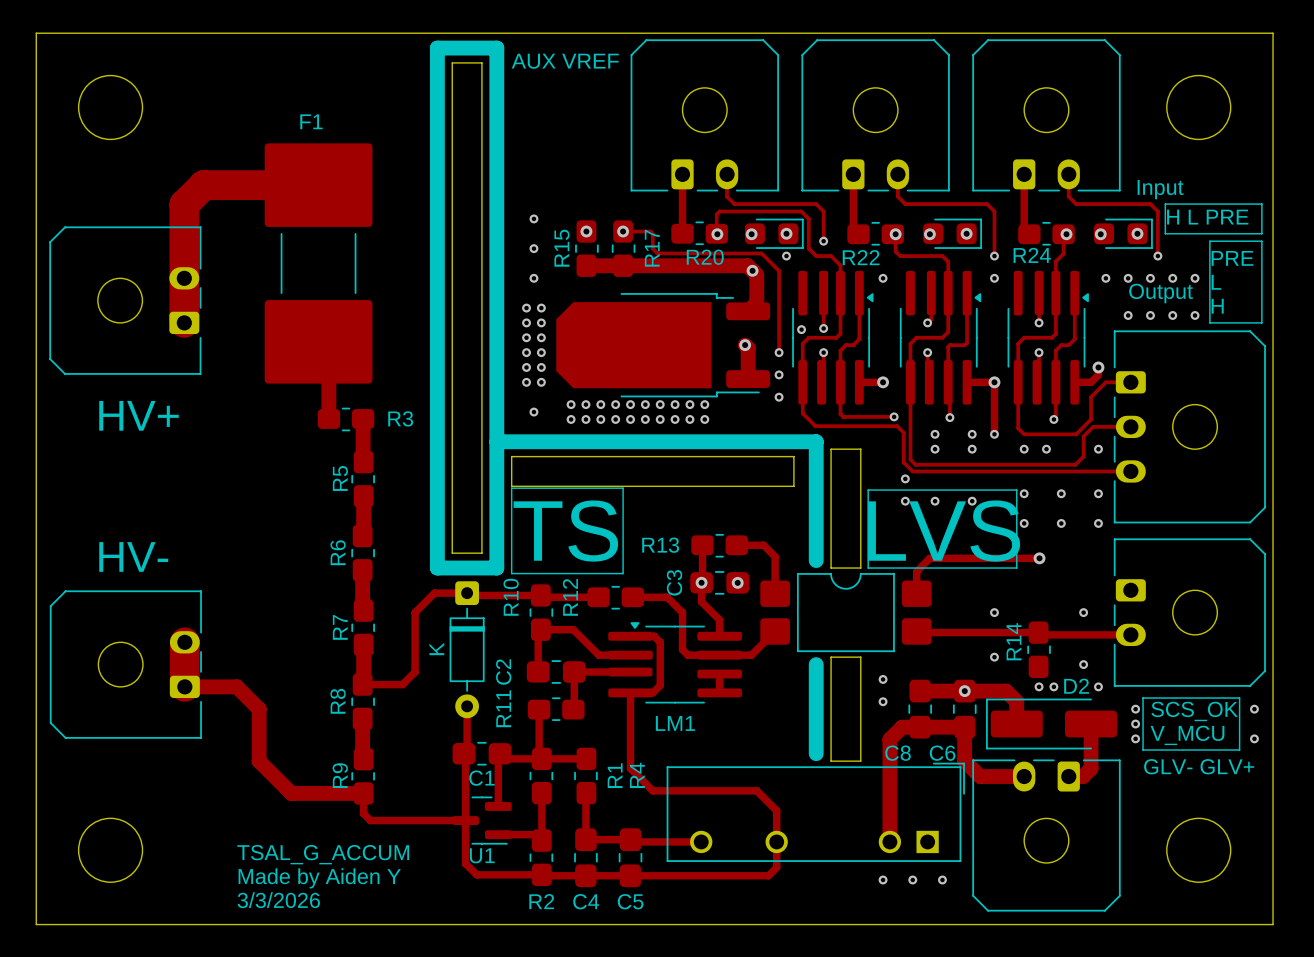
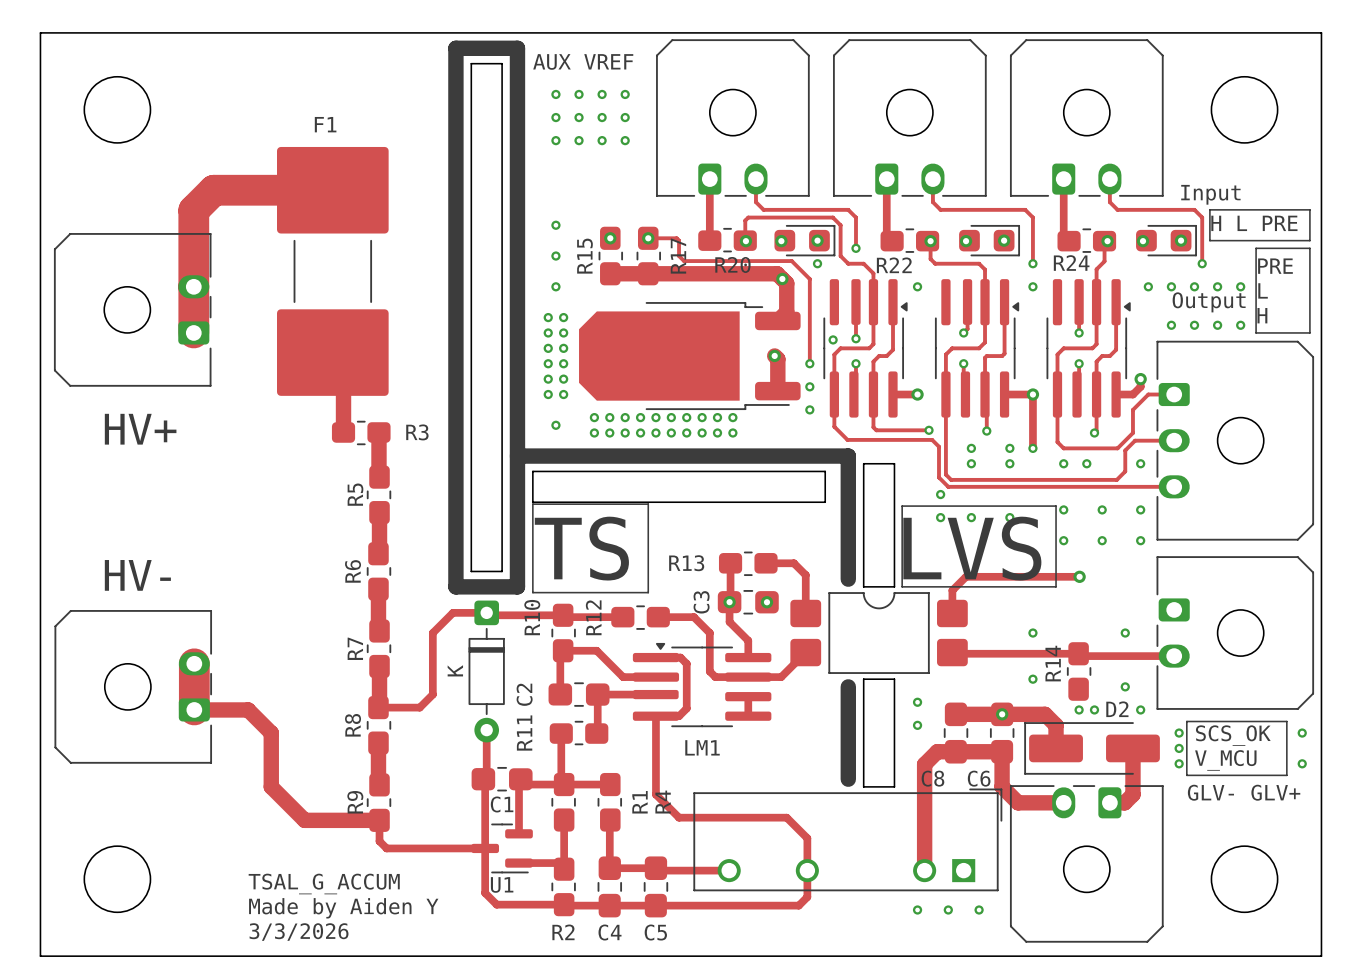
via: none -> (555, 94)
via: none -> (579, 94)
via: none -> (602, 94)
via: none -> (625, 94)
via: none -> (555, 117)
via: none -> (579, 117)
via: none -> (602, 117)
via: none -> (625, 117)
via: none -> (555, 140)
via: none -> (579, 140)
via: none -> (602, 140)
via: none -> (625, 140)

